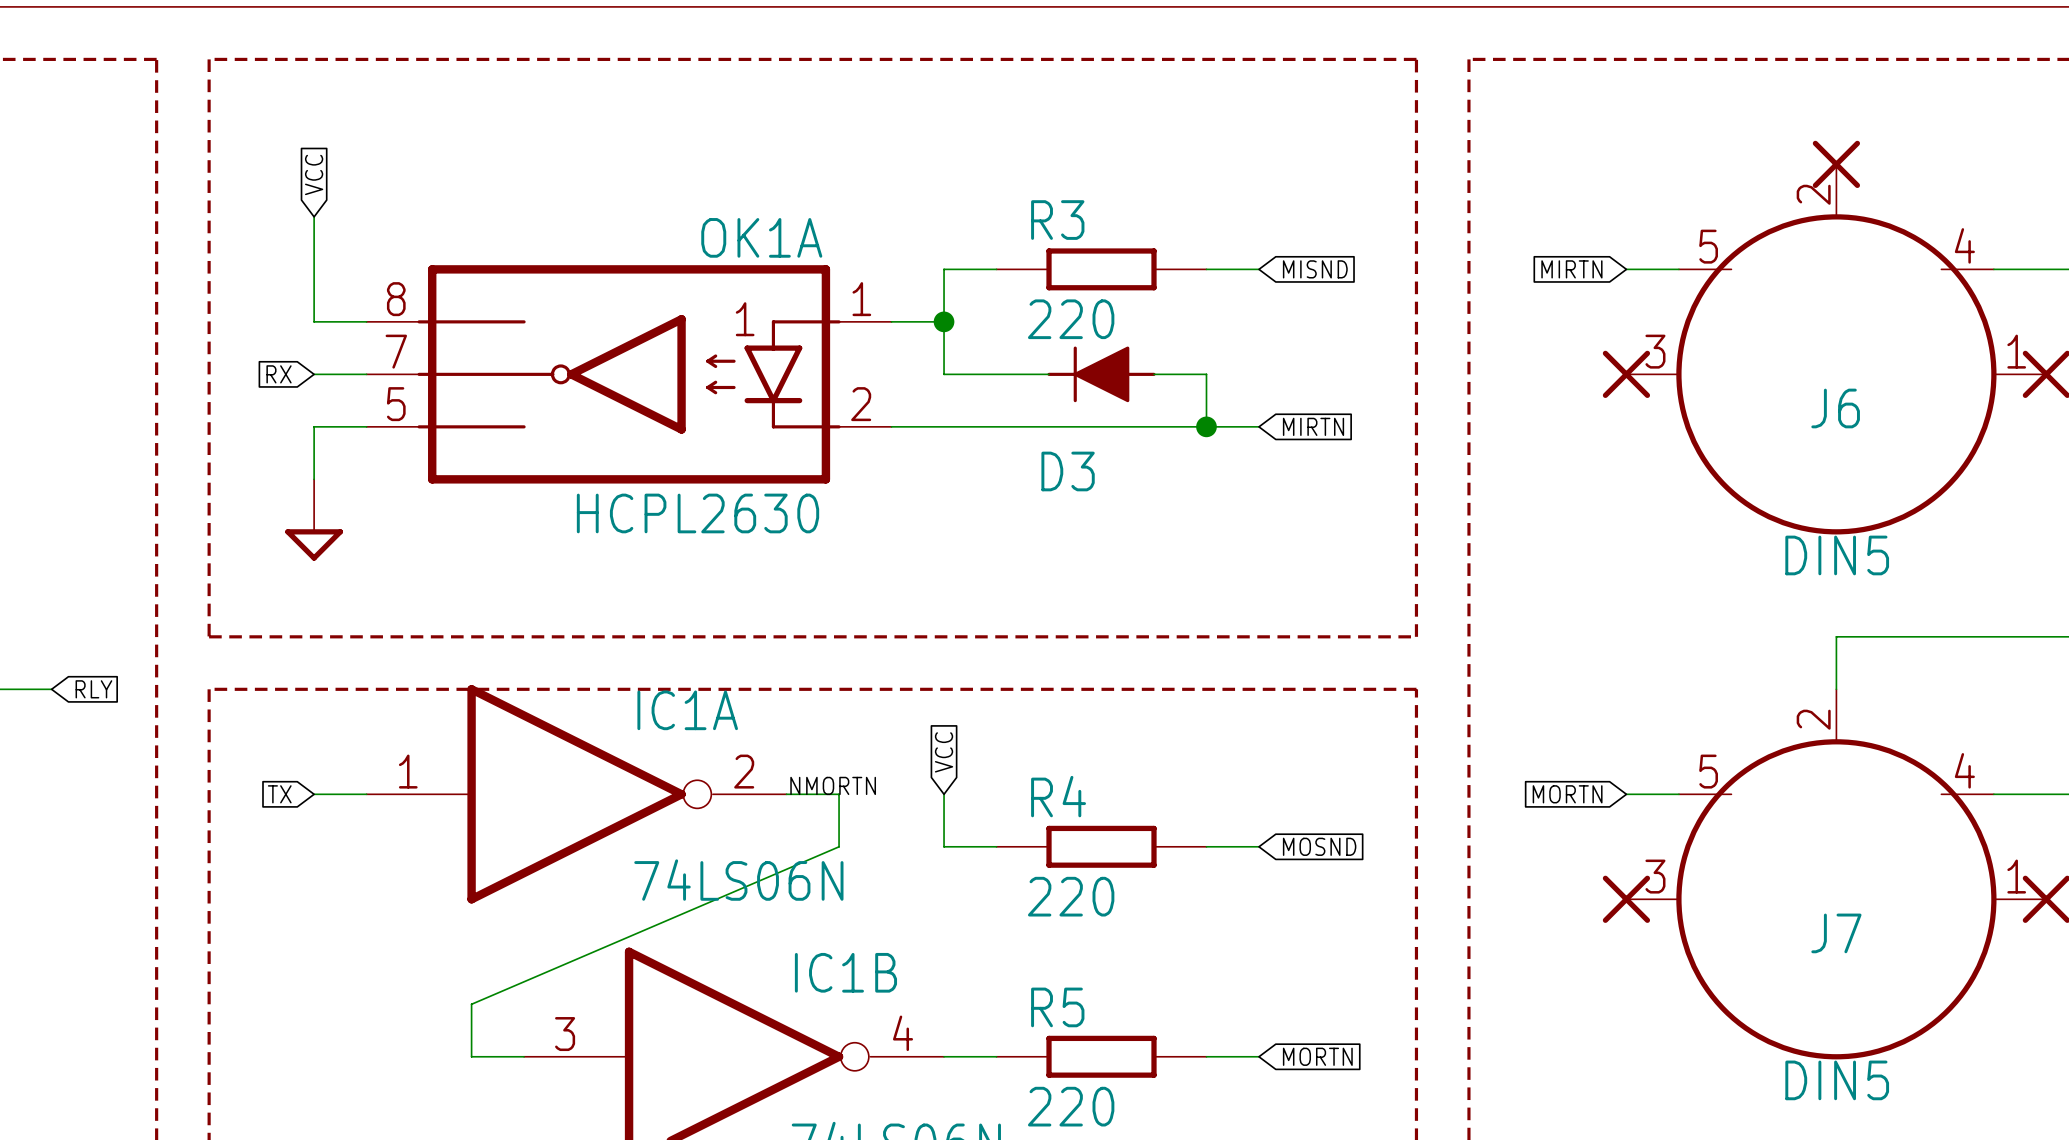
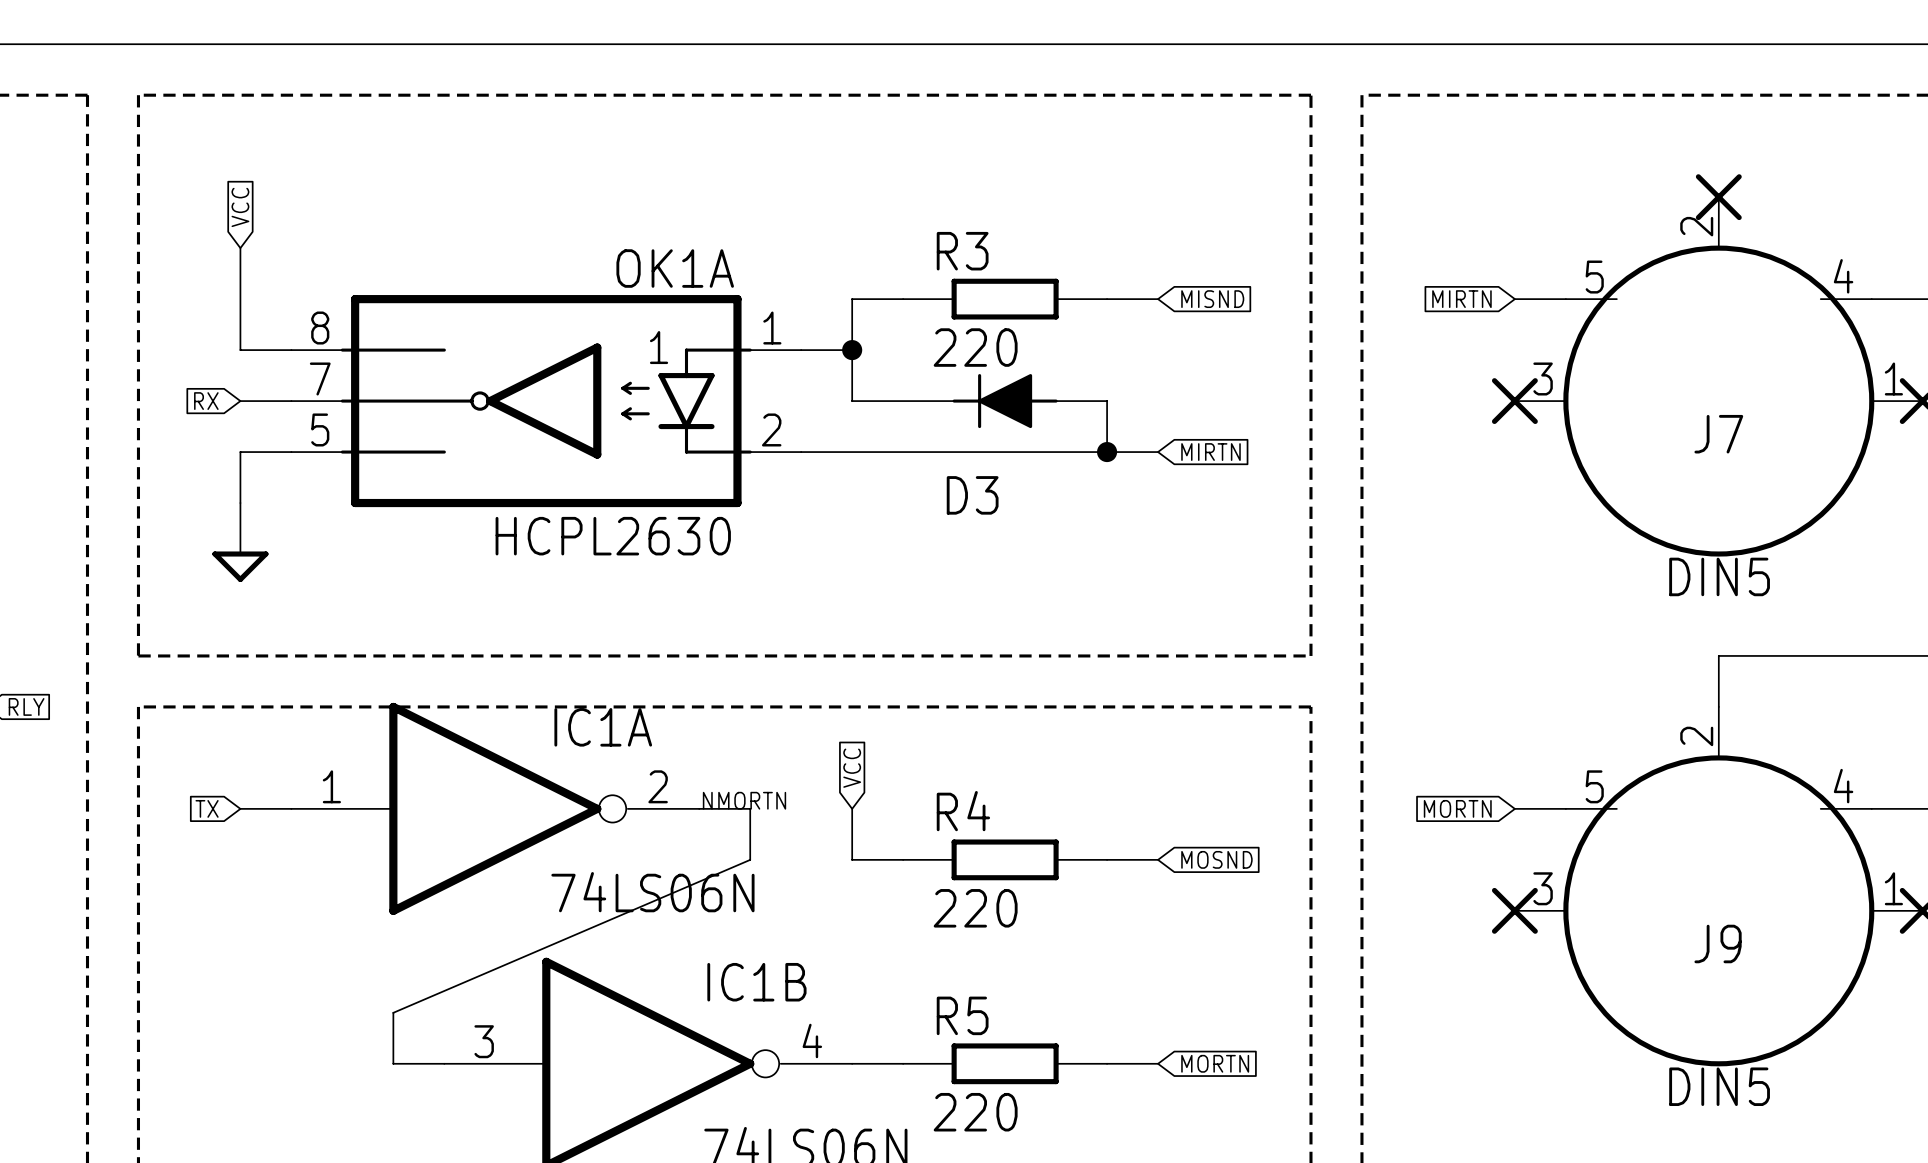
J6 name: J6 (1835, 408) -> J7 (1718, 434)
J7 name: J7 (1836, 933) -> J9 (1718, 943)

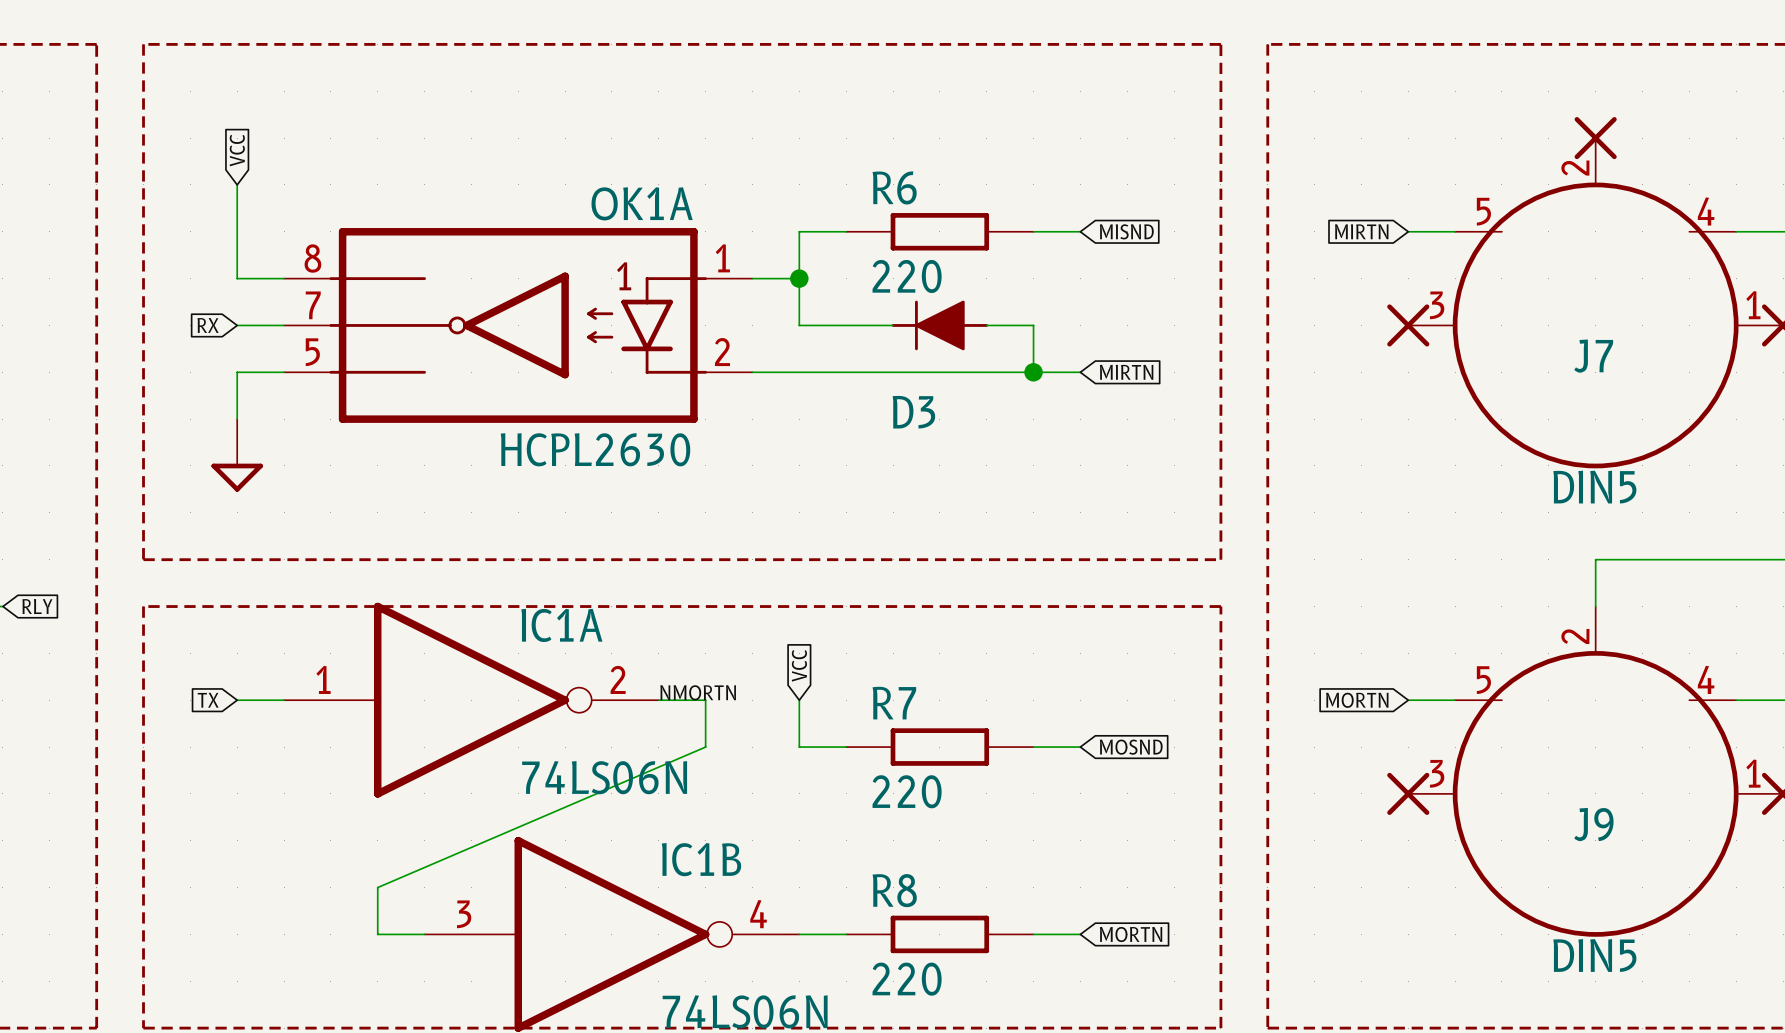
R3 name: R3 (962, 251) -> R6 (894, 187)
R4 name: R4 (963, 811) -> R7 (894, 703)
R5 name: R5 (962, 1015) -> R8 (894, 890)

